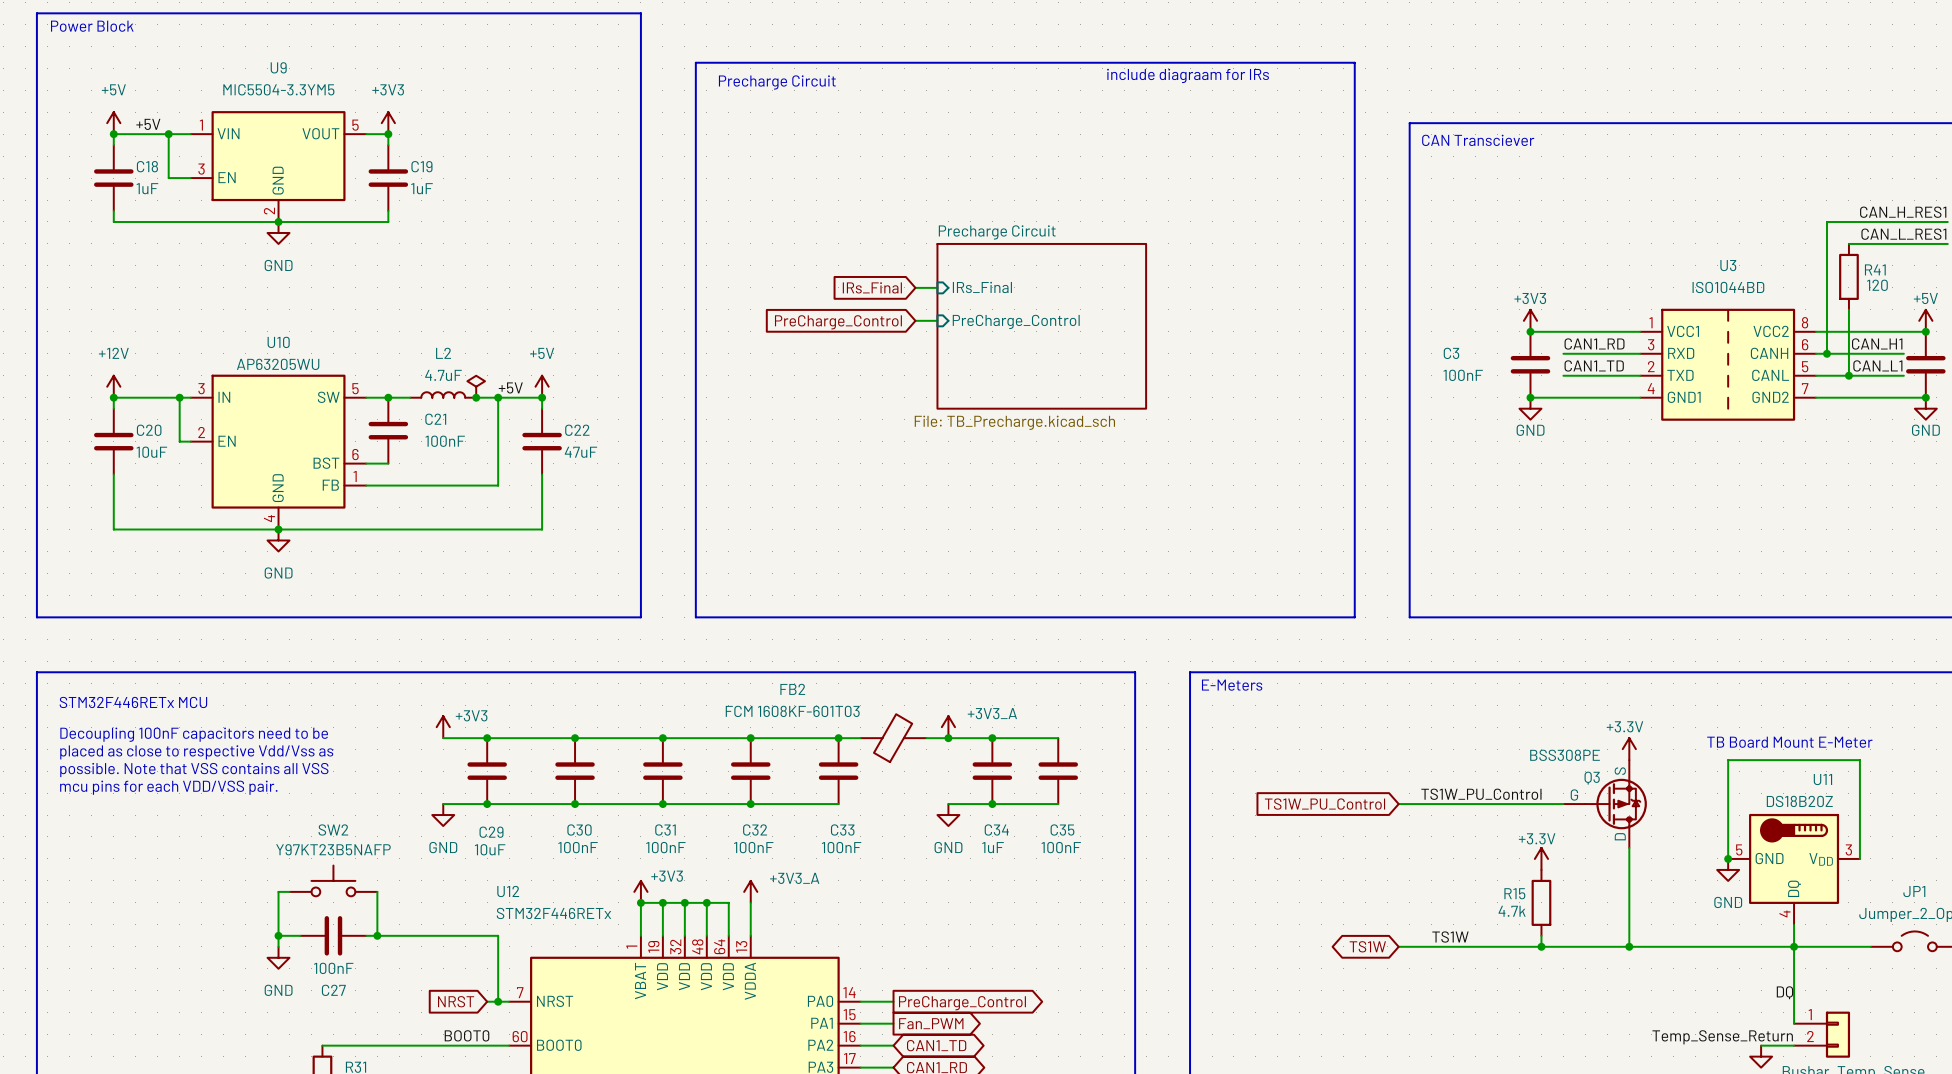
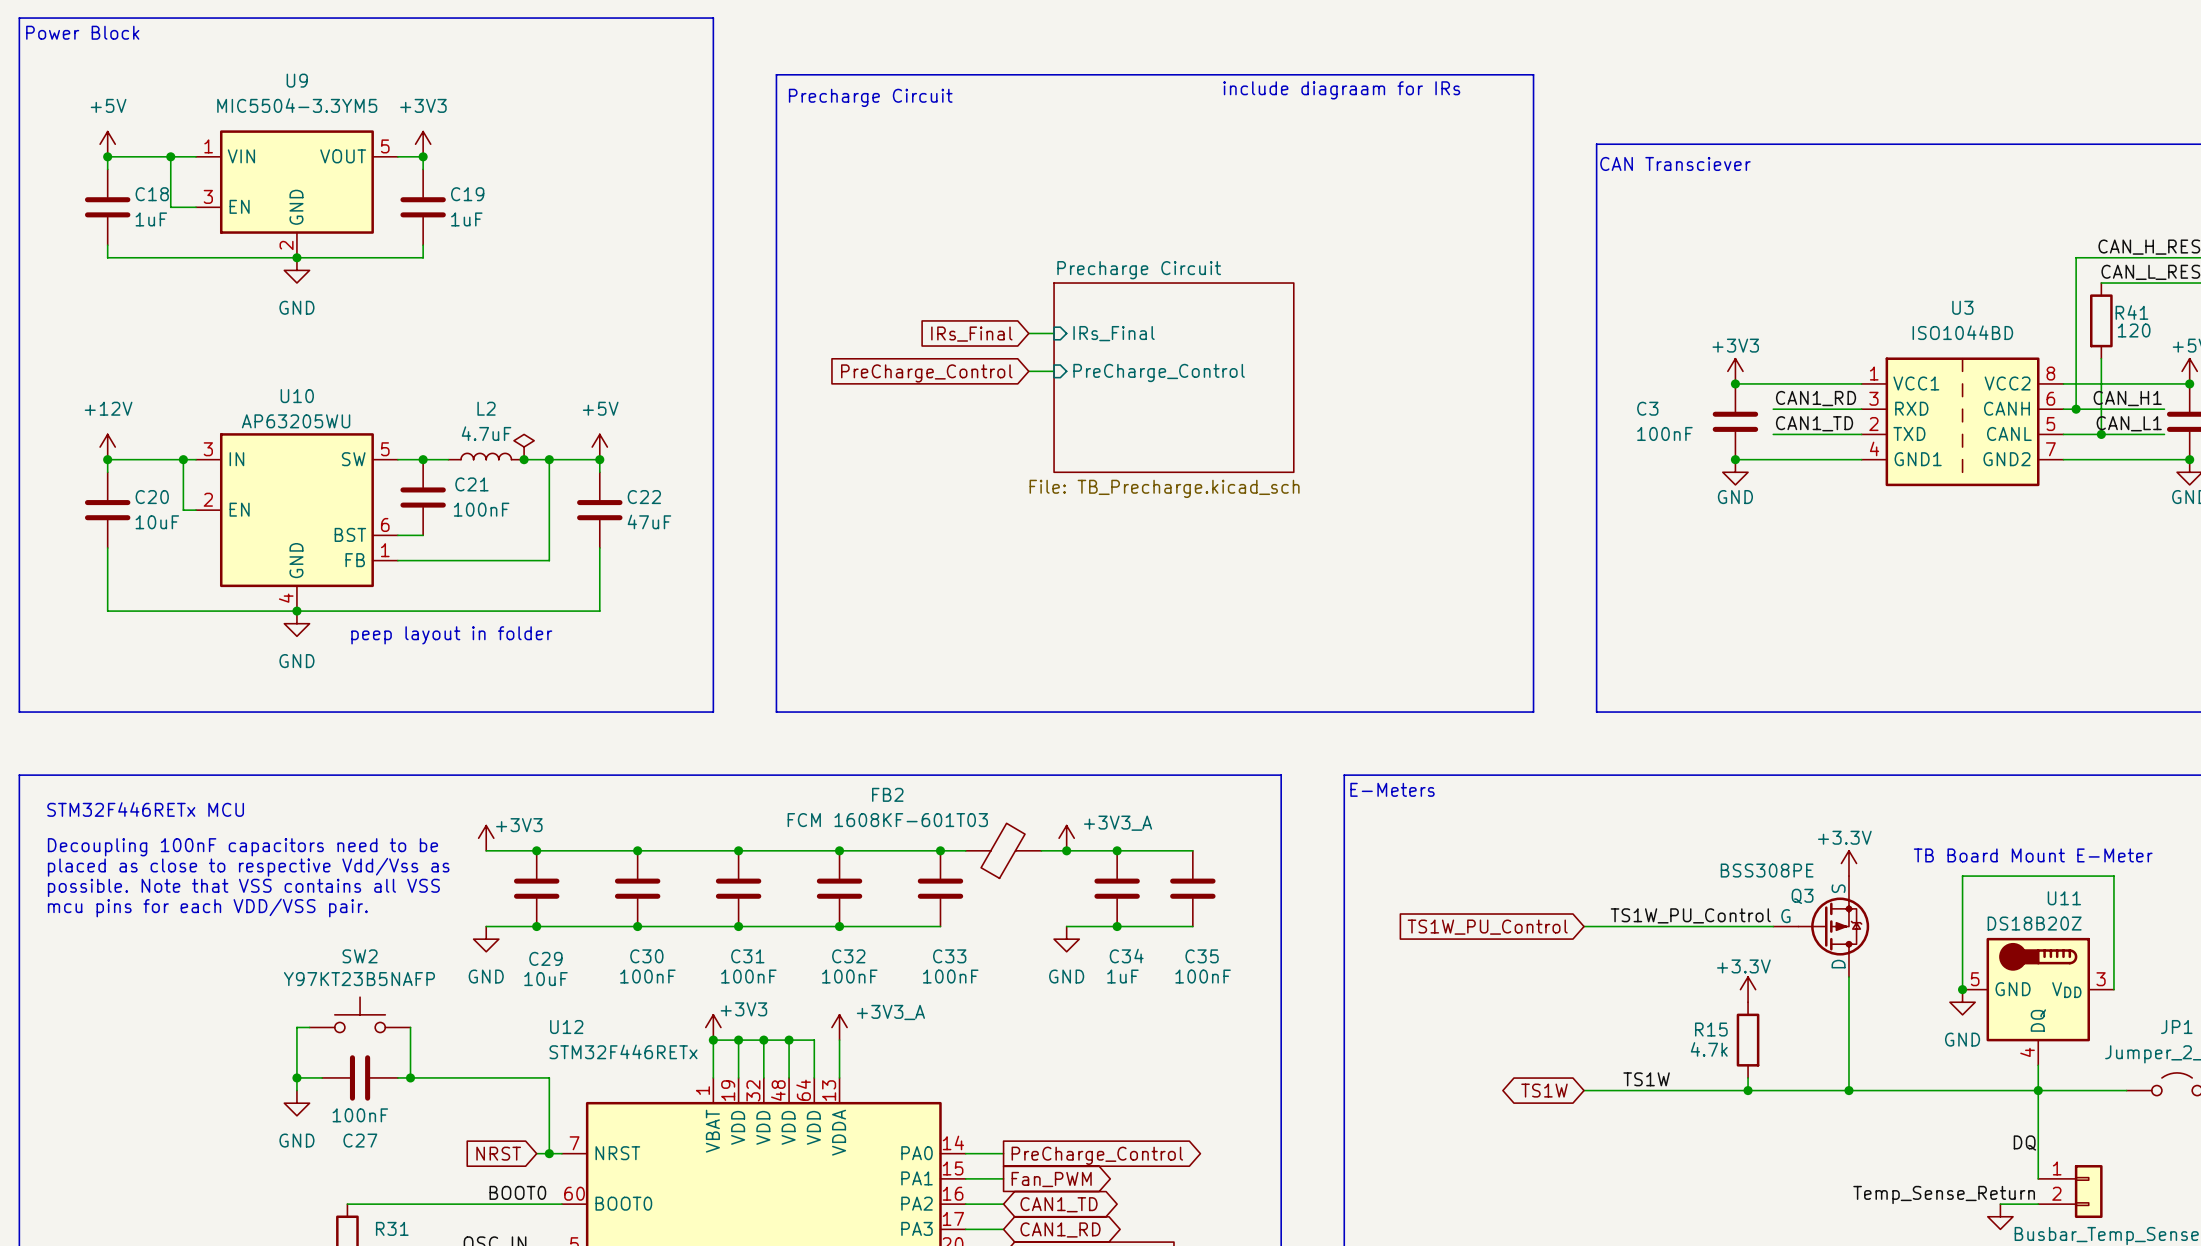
label: +5V (148, 124) -> none
label: +5V (510, 387) -> none
text: none -> peep layout in folder (451, 635)

